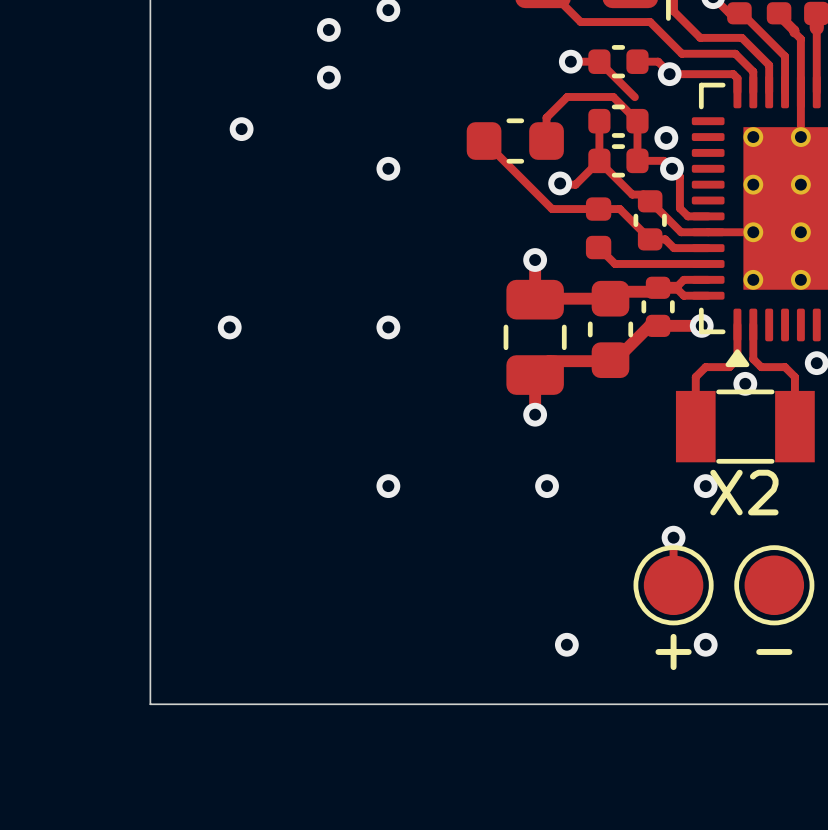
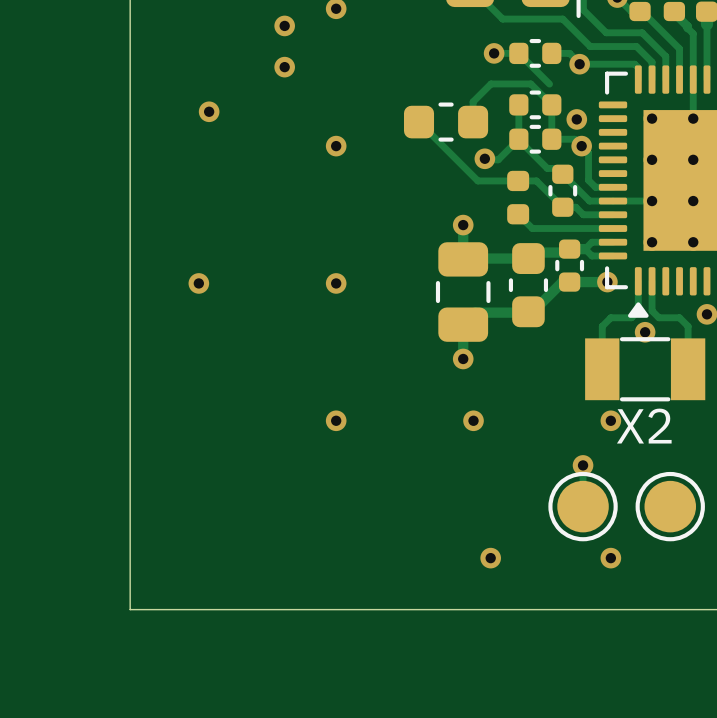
text: + (673, 651) -> none
text: - (774, 651) -> none

